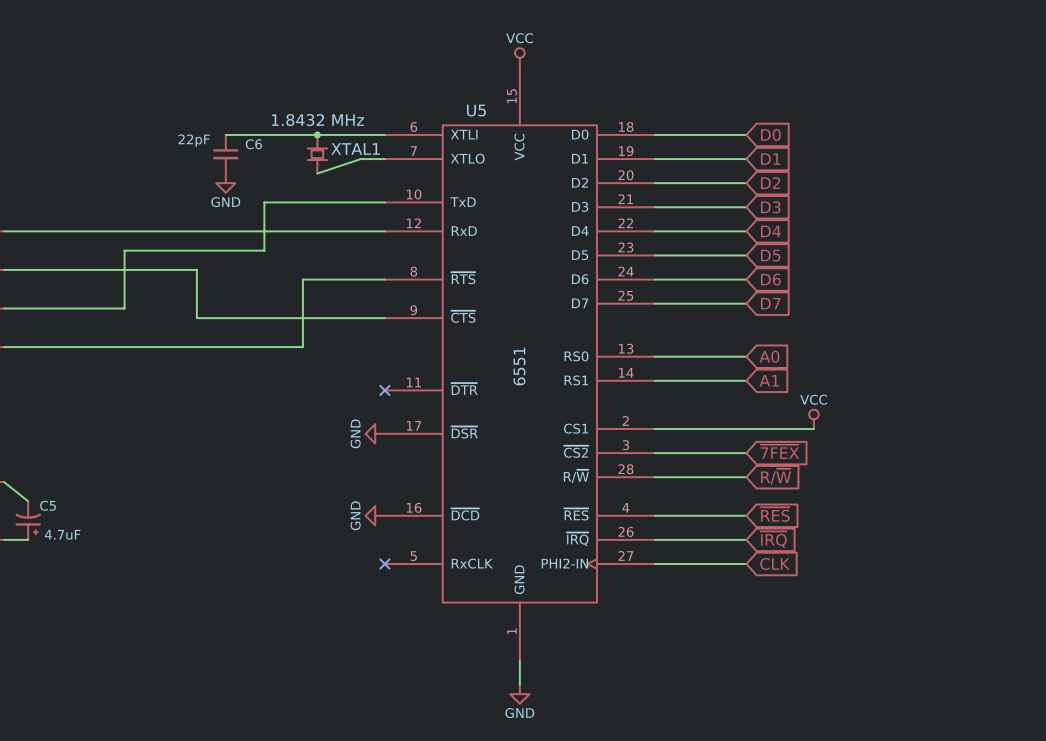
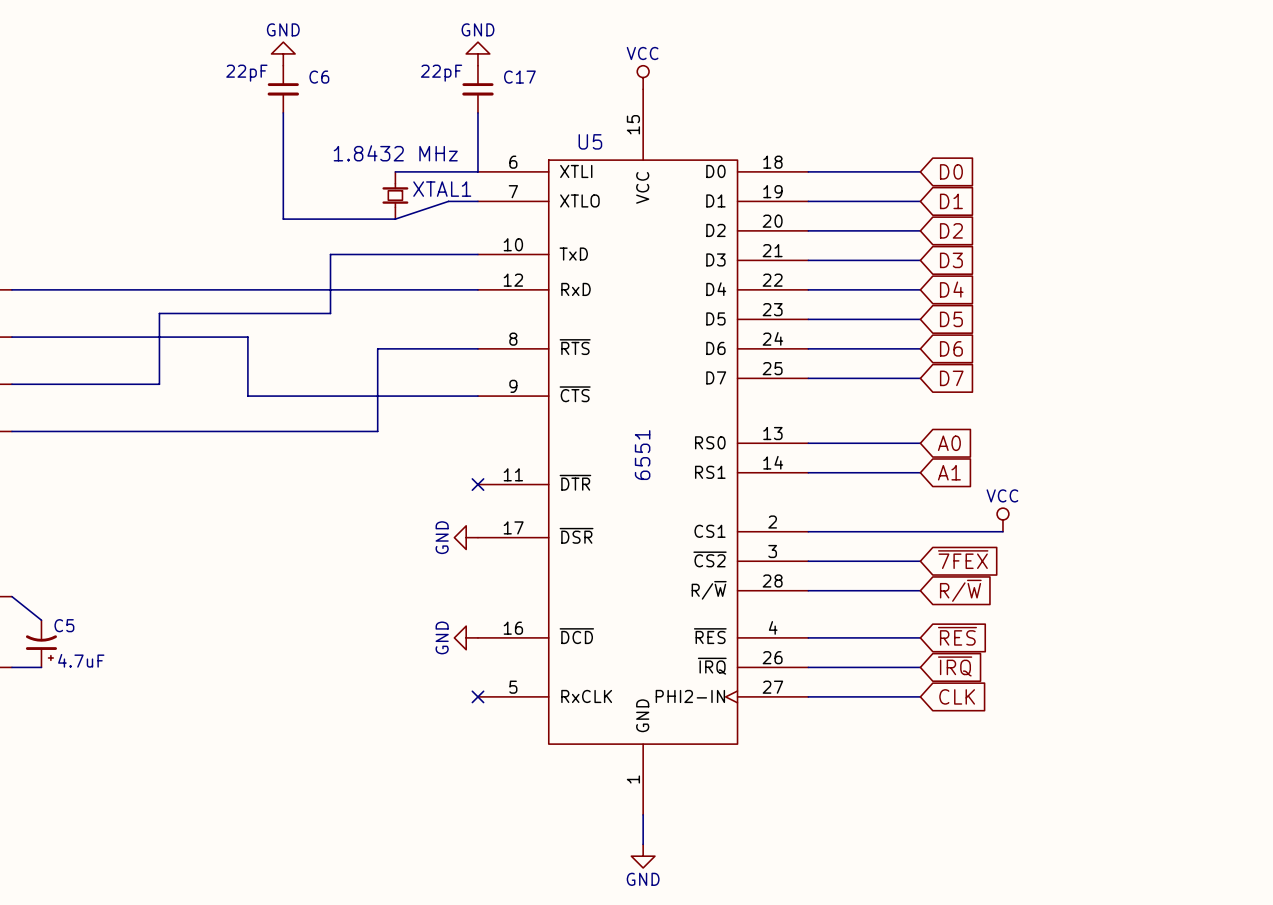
power symbol: none -> GND (283, 53)
power symbol: none -> GND (477, 53)
C17: none -> 22pF (477, 89)
wire: none -> (283, 112) (283, 219) (395, 219)
wire: none -> (477, 112) (477, 171)
wire: (225, 134) (317, 134) -> none
junction: (317, 134) -> none
C6 position: (225, 154) -> (283, 89)
power symbol: GND (225, 183) -> none

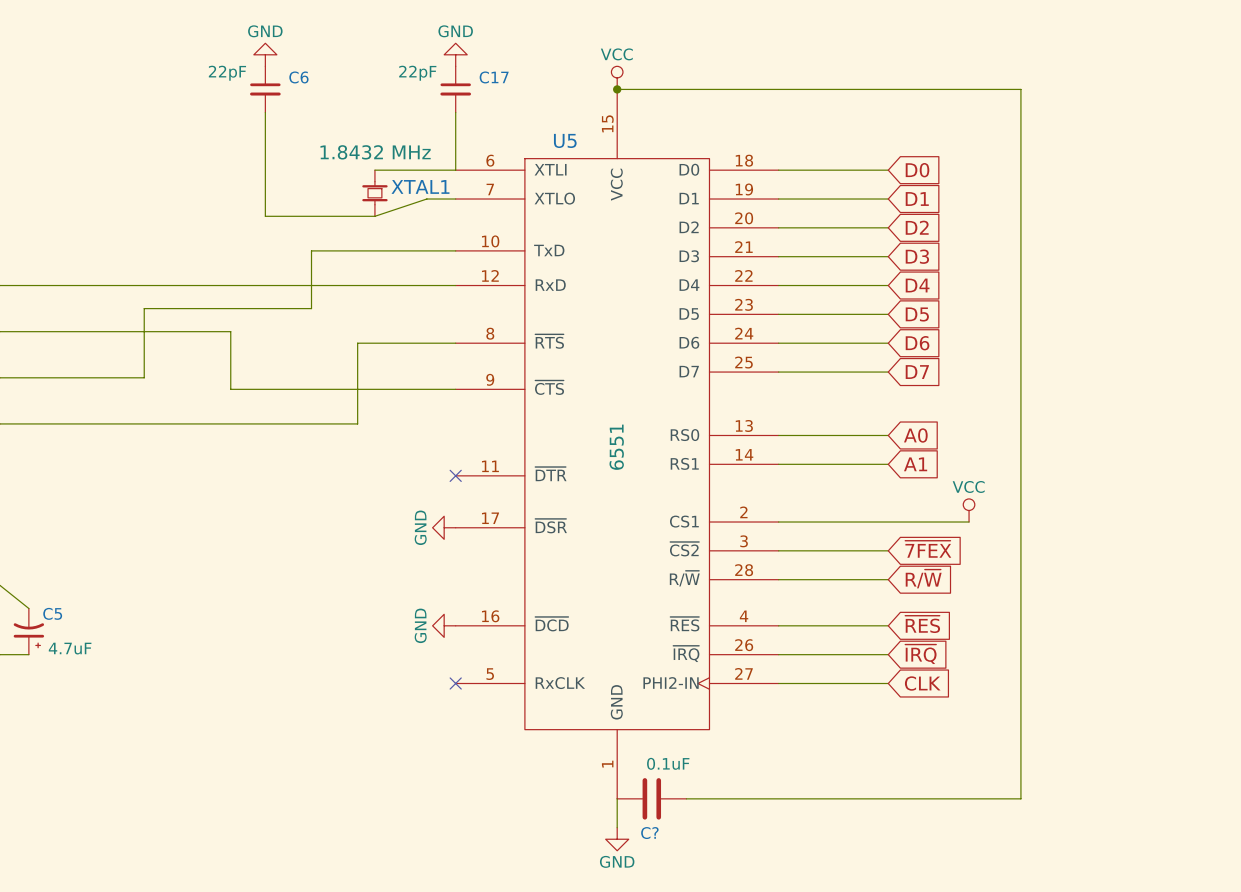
wire: none -> (617, 89) (1020, 89) (1020, 798) (686, 798)
junction: none -> (617, 89)
C?: none -> 0.1uF (651, 798)

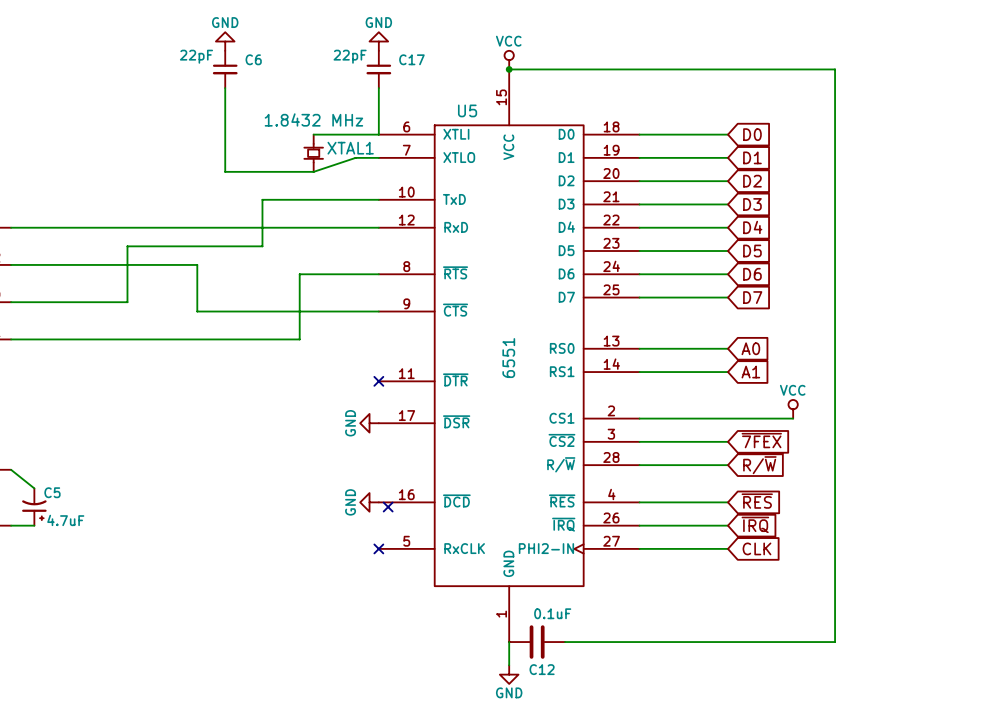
no-connect mark: none -> (388, 507)
C? name: C? (649, 833) -> C12 (542, 669)

